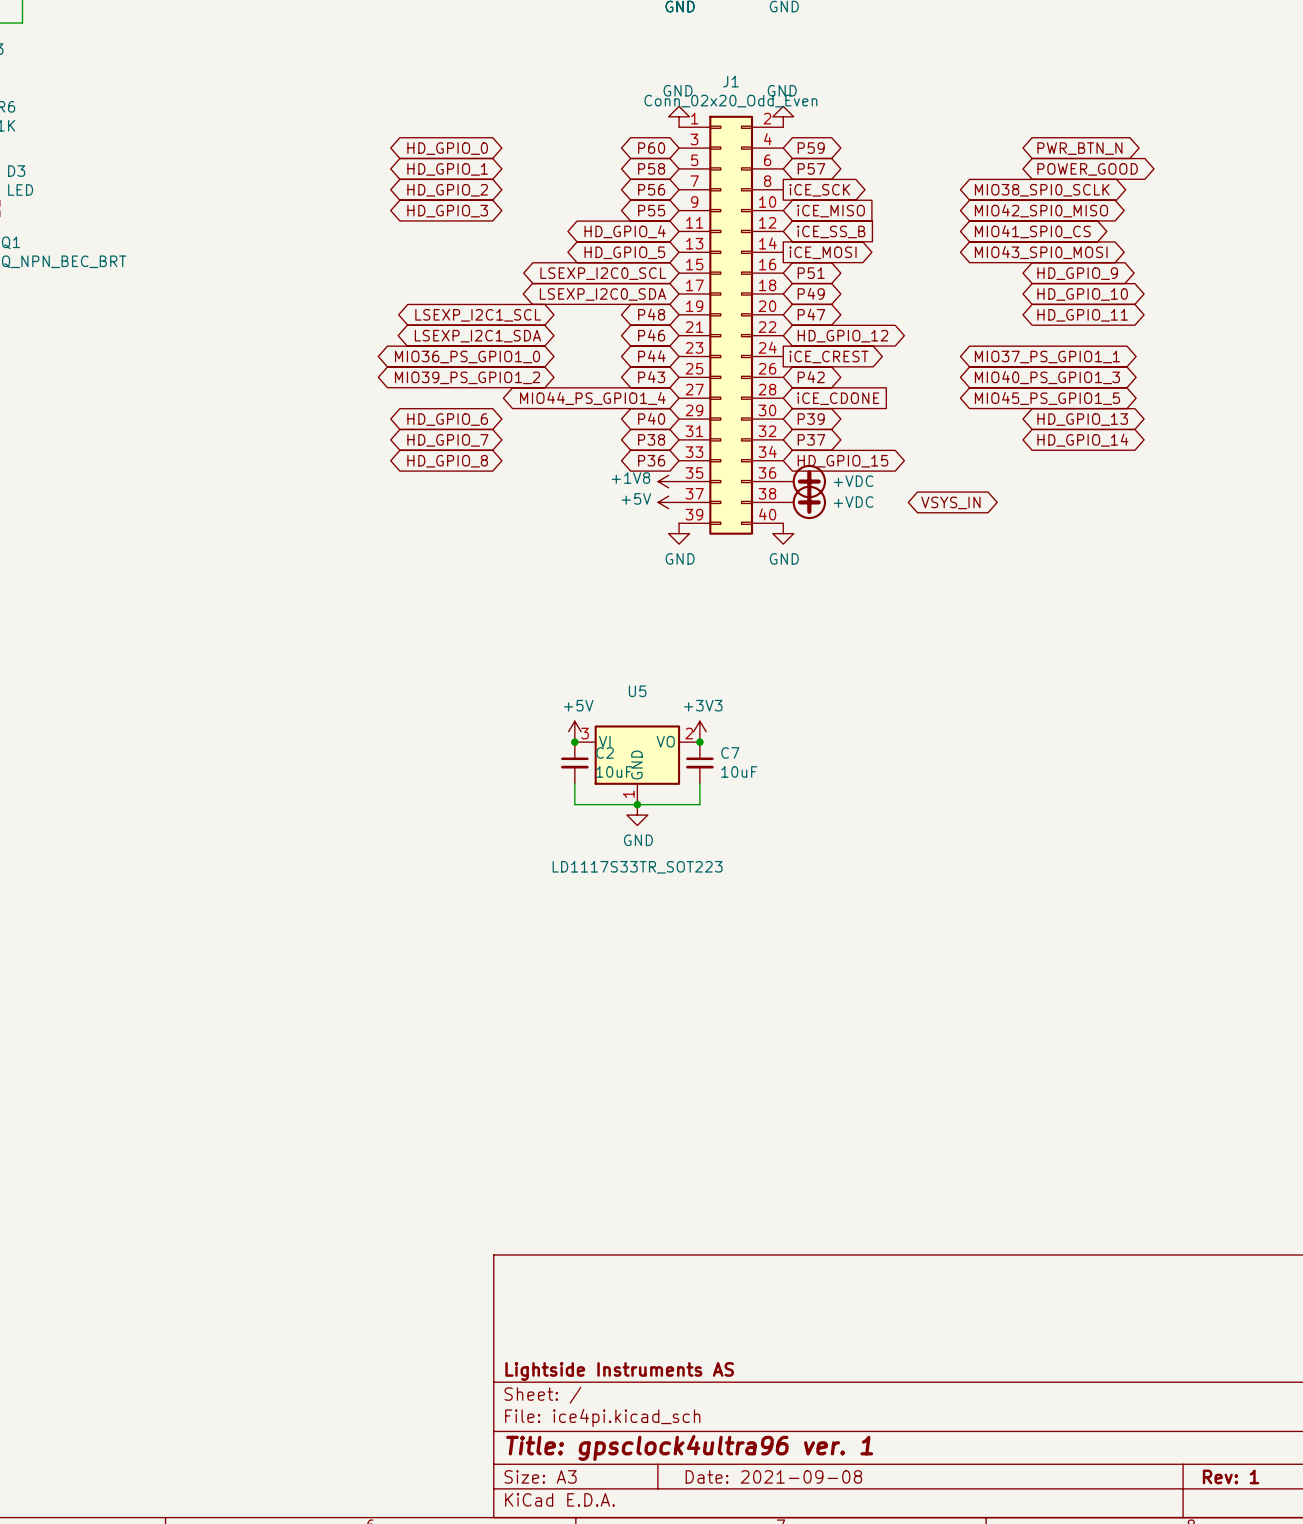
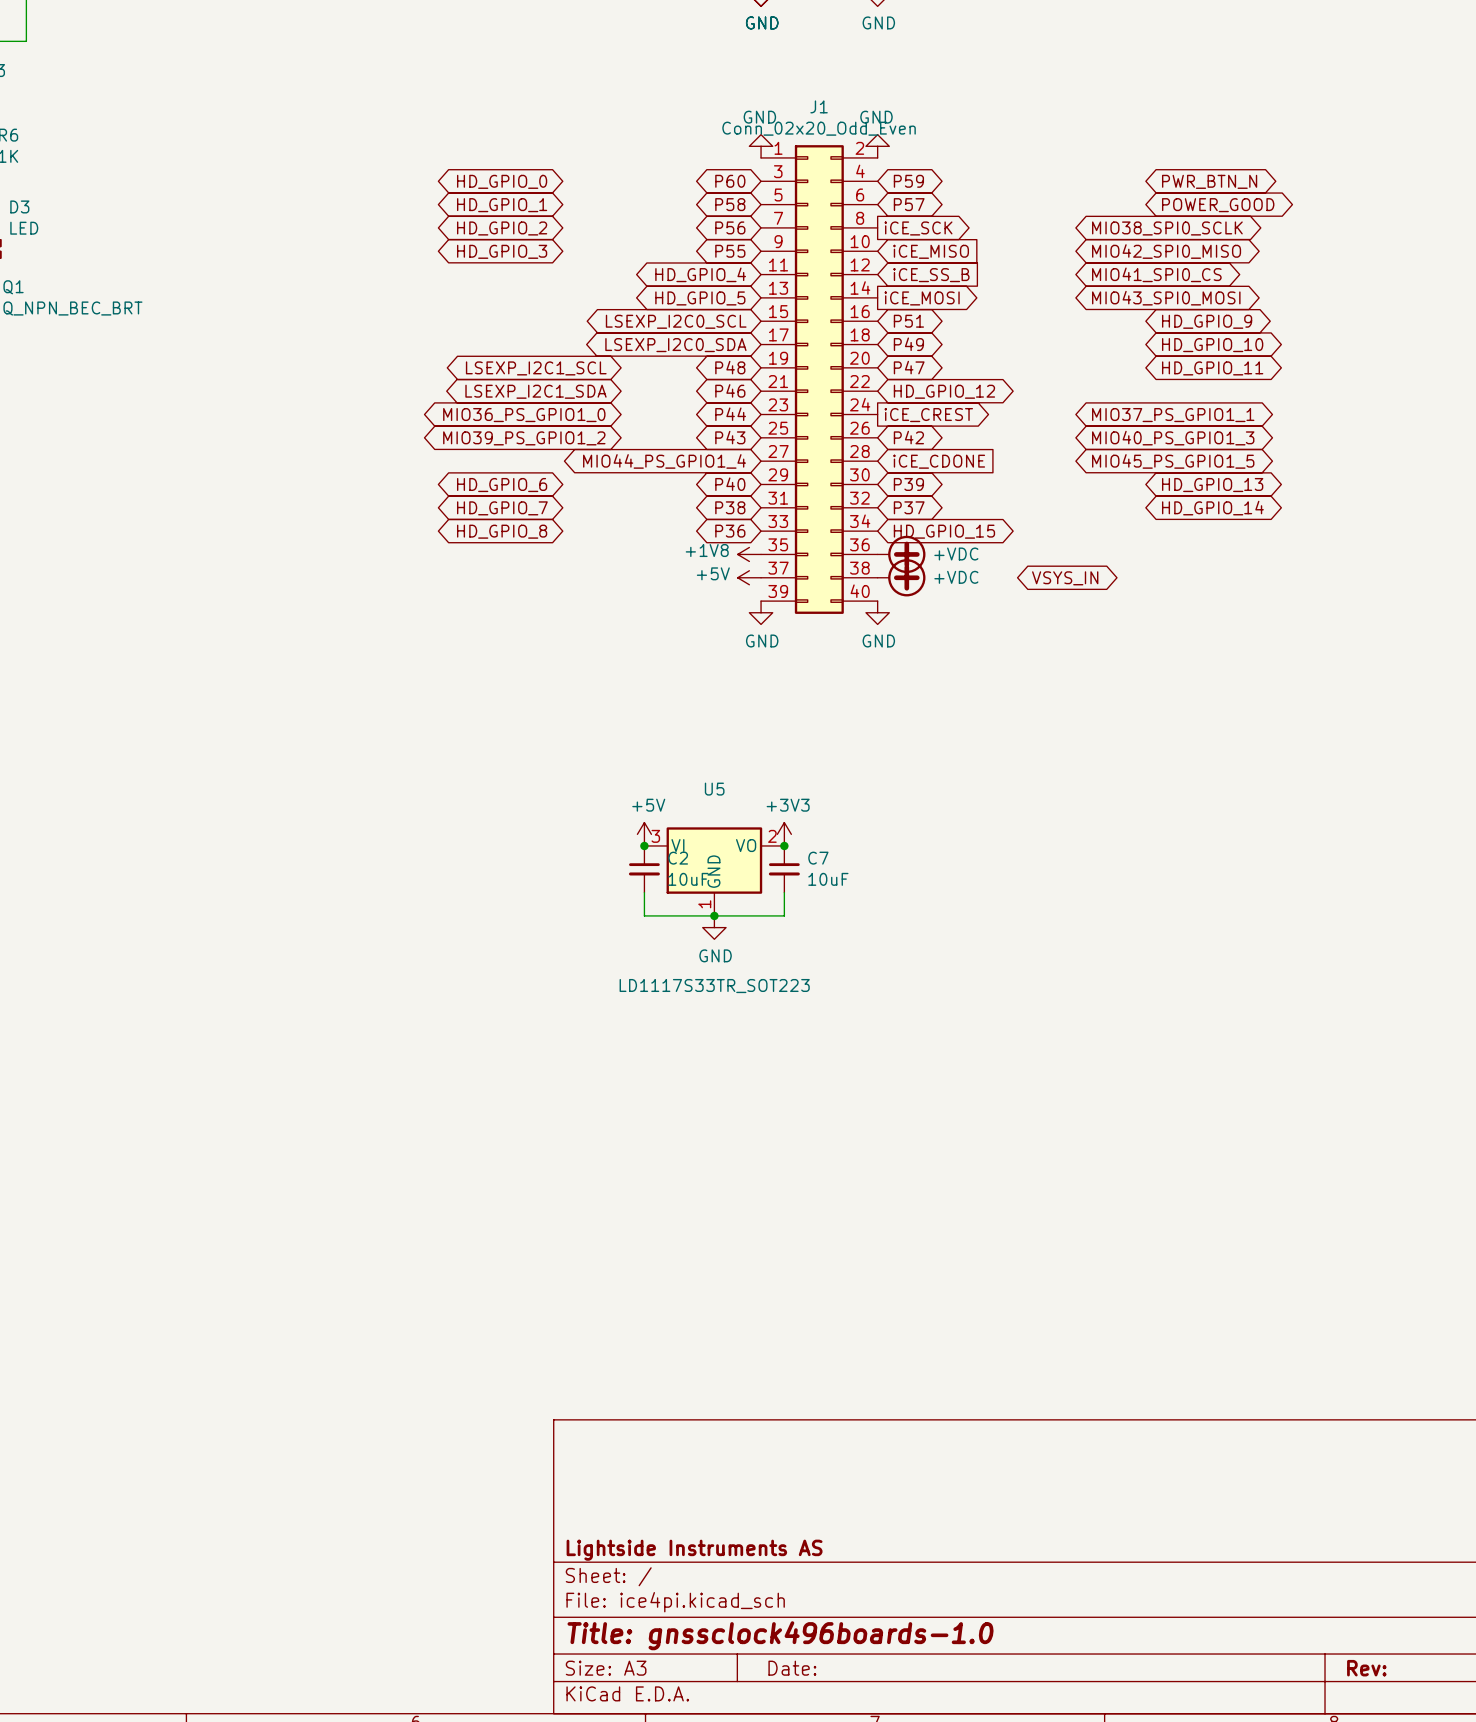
title block: Title: gpsclock4ultra96 ver. 1 (689, 1447) -> Title: gnssclock496boards-1.0 (780, 1635)
title block: Date: 2021-09-08 (773, 1476) -> Date: (792, 1668)
title block: Rev: 1 (1231, 1476) -> Rev: (1366, 1668)

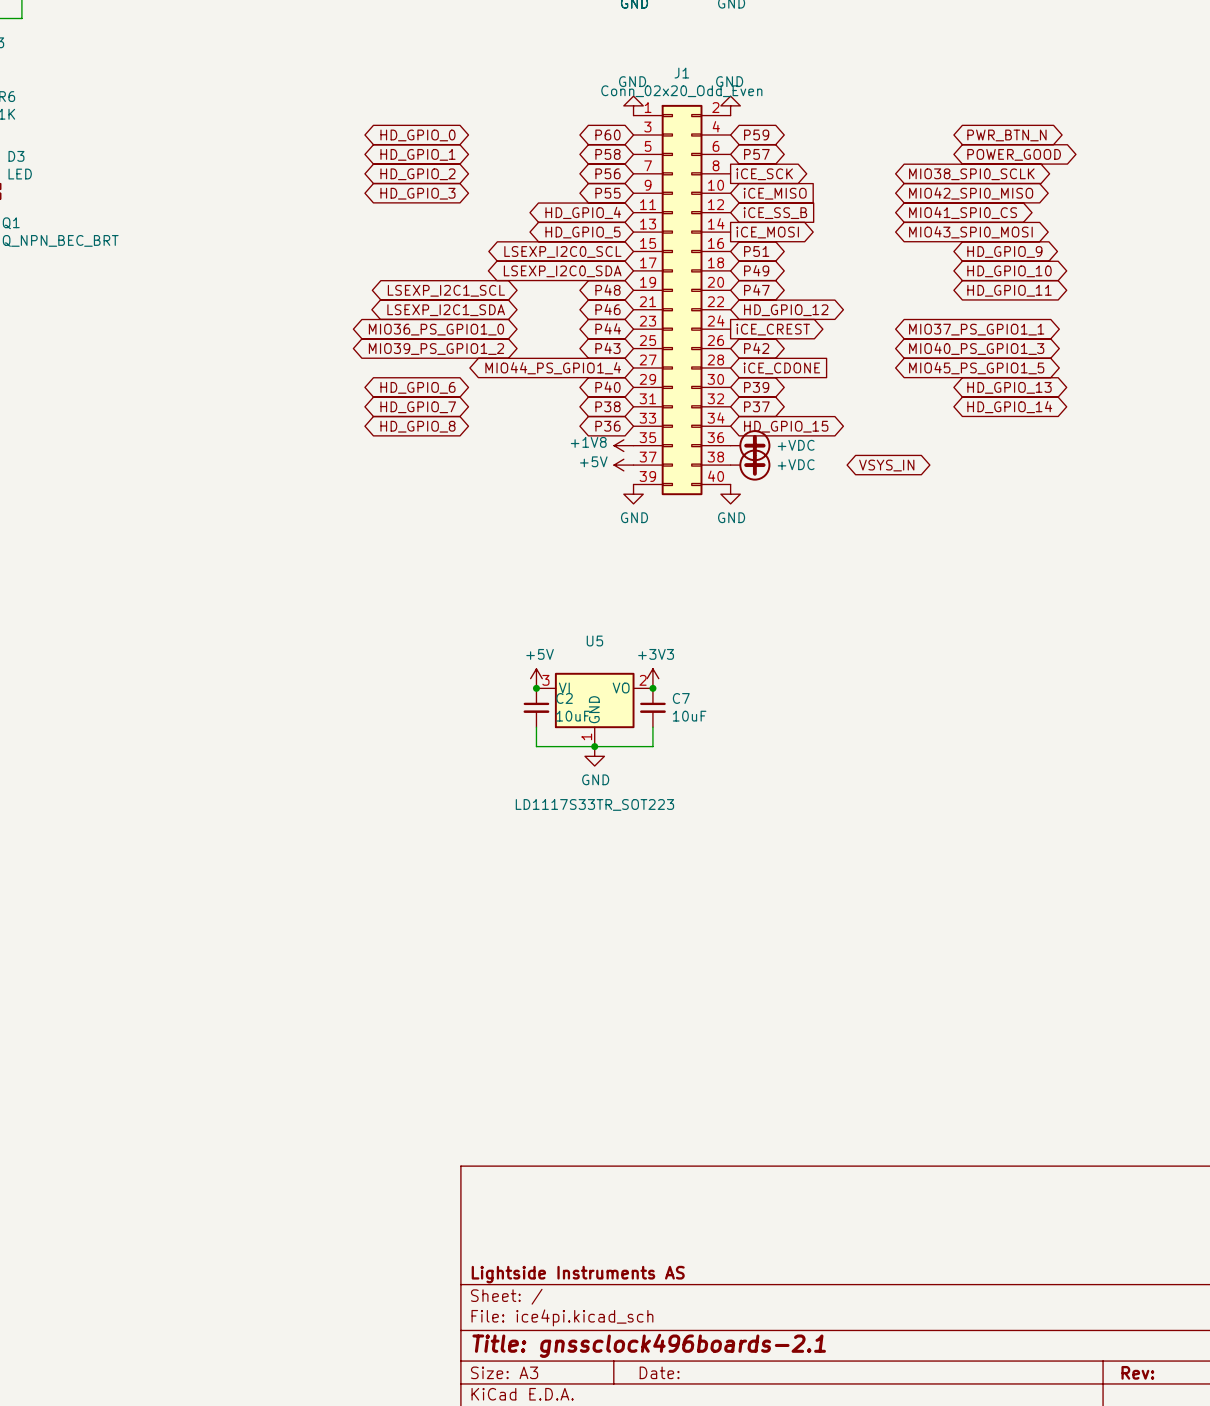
title block: Title: gnssclock496boards-1.0 (780, 1635) -> Title: gnssclock496boards-2.1 (649, 1345)

